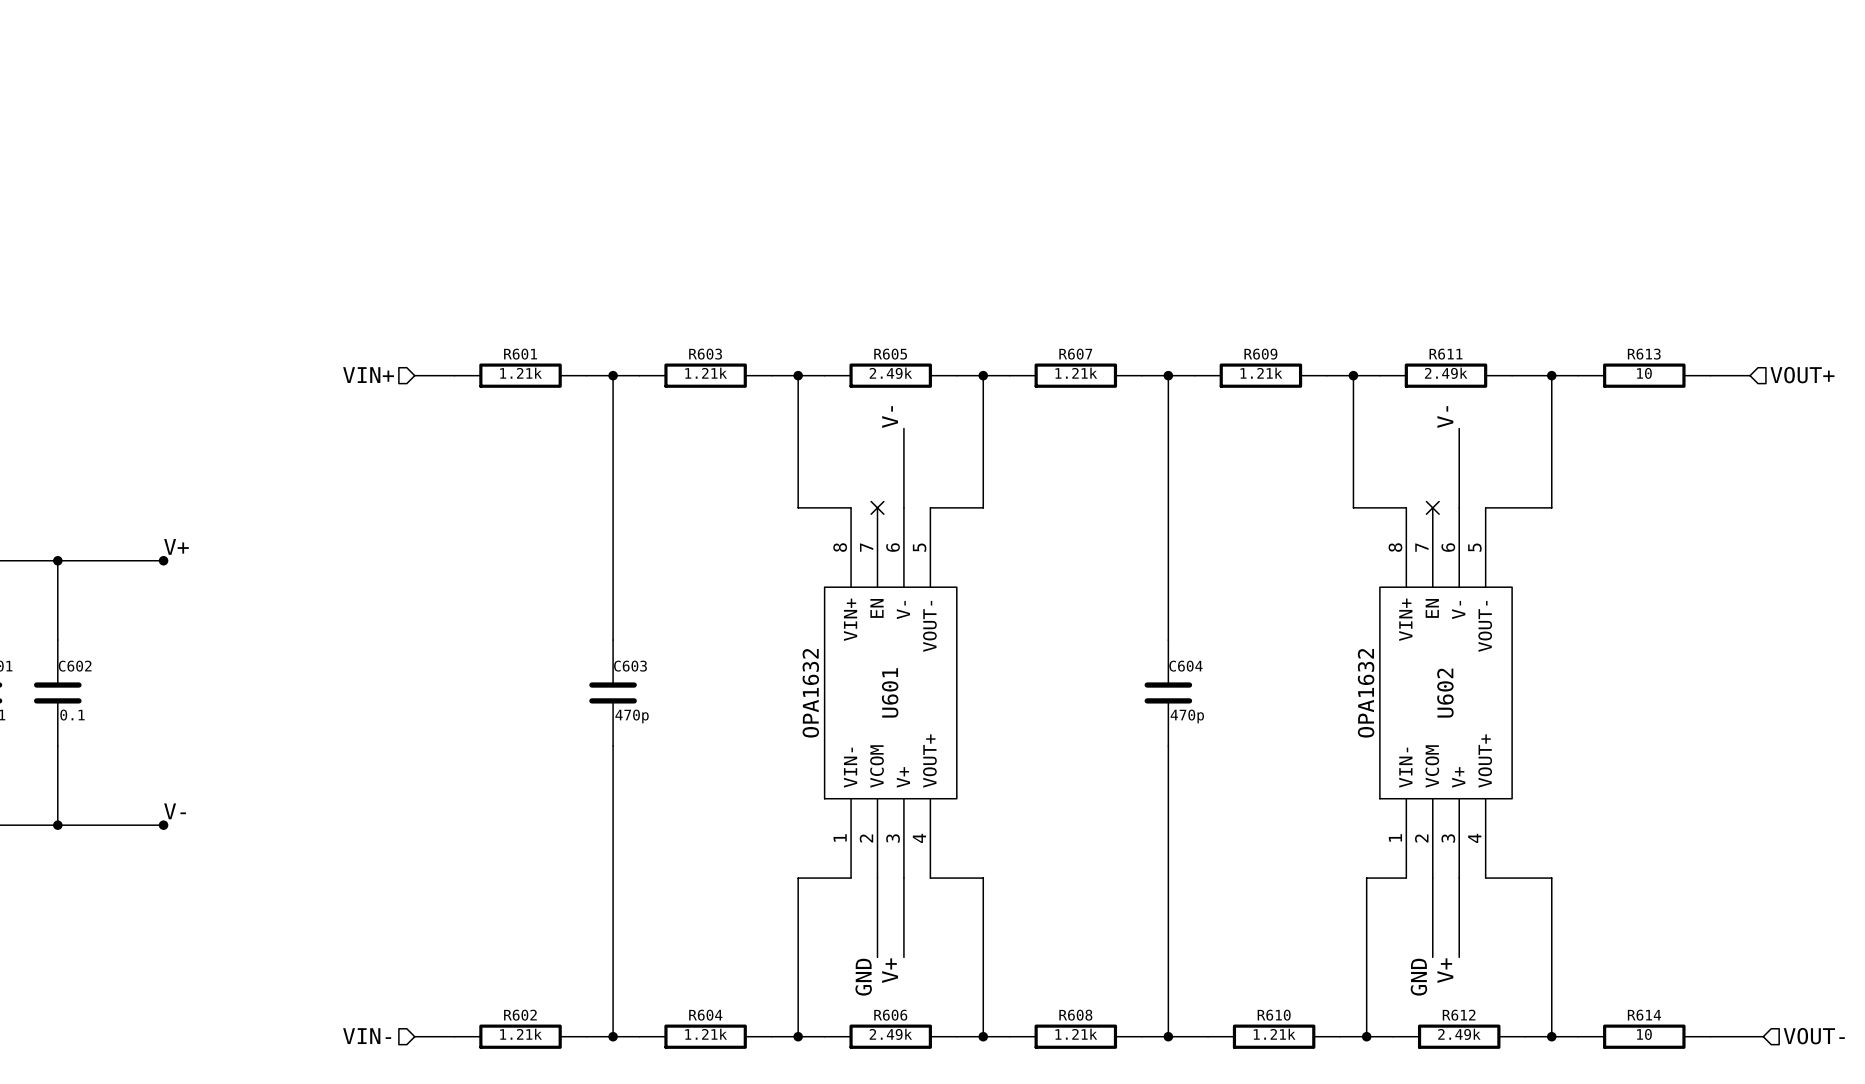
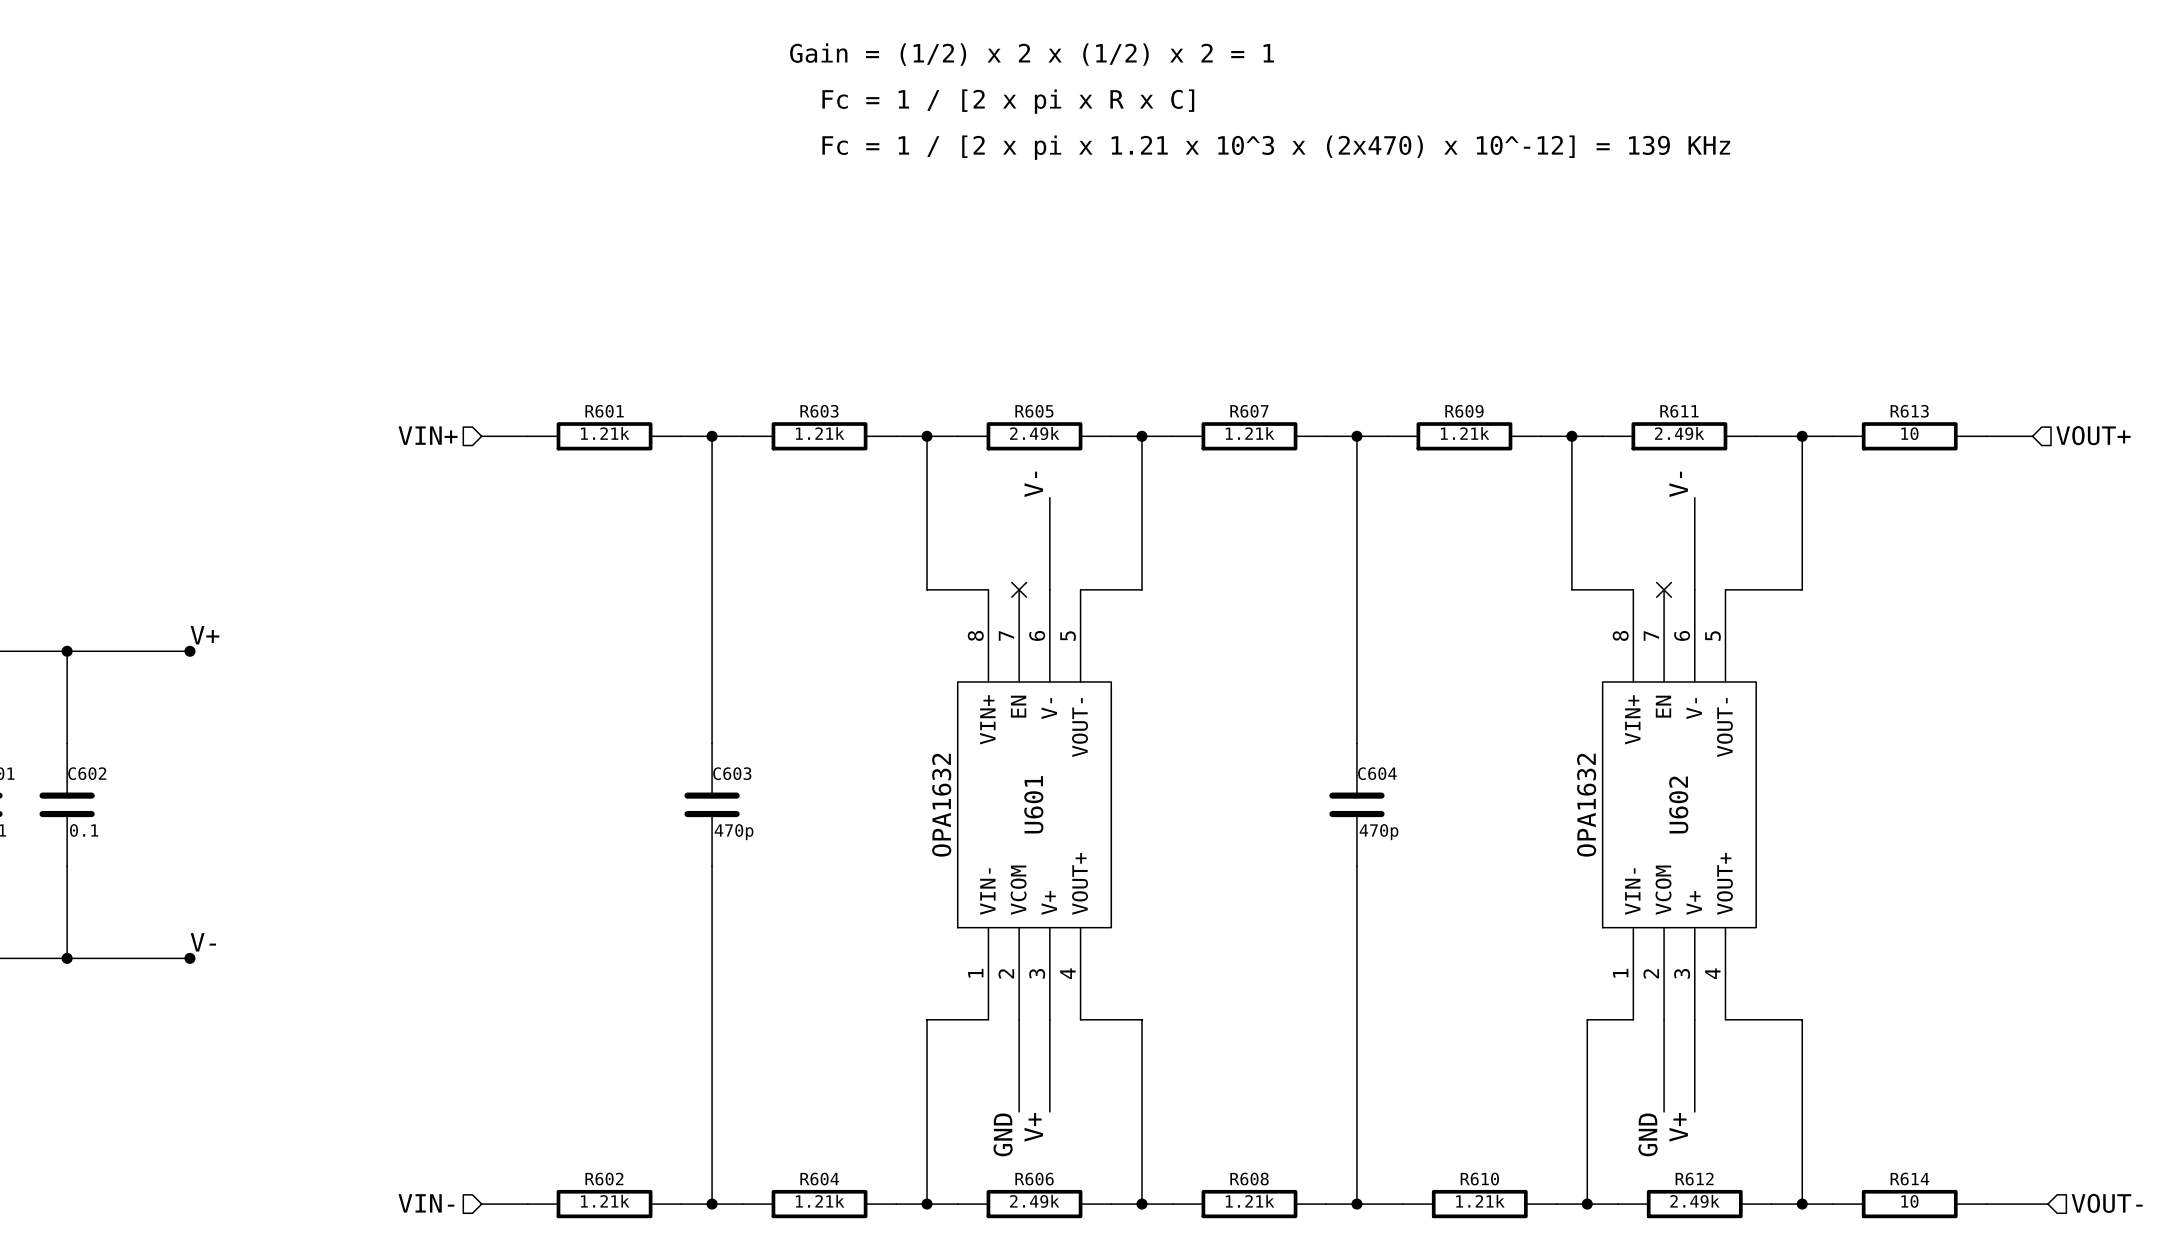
text: none -> Gain = (1/2) x 2 x (1/2) x 2 = 1 (1032, 54)
text: none -> Fc = 1 / [2 x pi x R x C] (1008, 101)
text: none -> Fc = 1 / [2 x pi x 1.21 x 10^3 x (2x470) x 10^-12] = 139 KHz (1276, 147)

